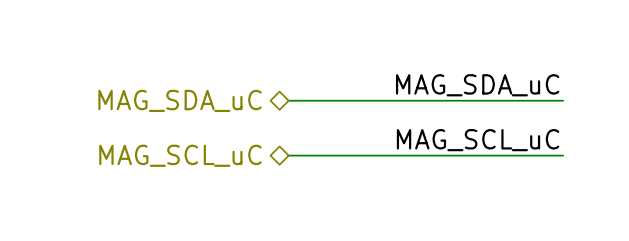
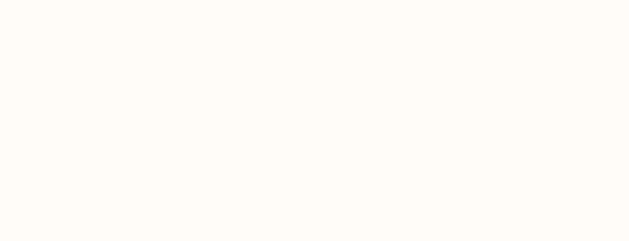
label: MAG_SDA_uC (477, 85) -> none
hierarchical label: MAG_SDA_uC (180, 100) -> none
wire: (288, 100) (563, 100) -> none
label: MAG_SCL_uC (478, 140) -> none
hierarchical label: MAG_SCL_uC (180, 155) -> none
wire: (288, 155) (563, 155) -> none

